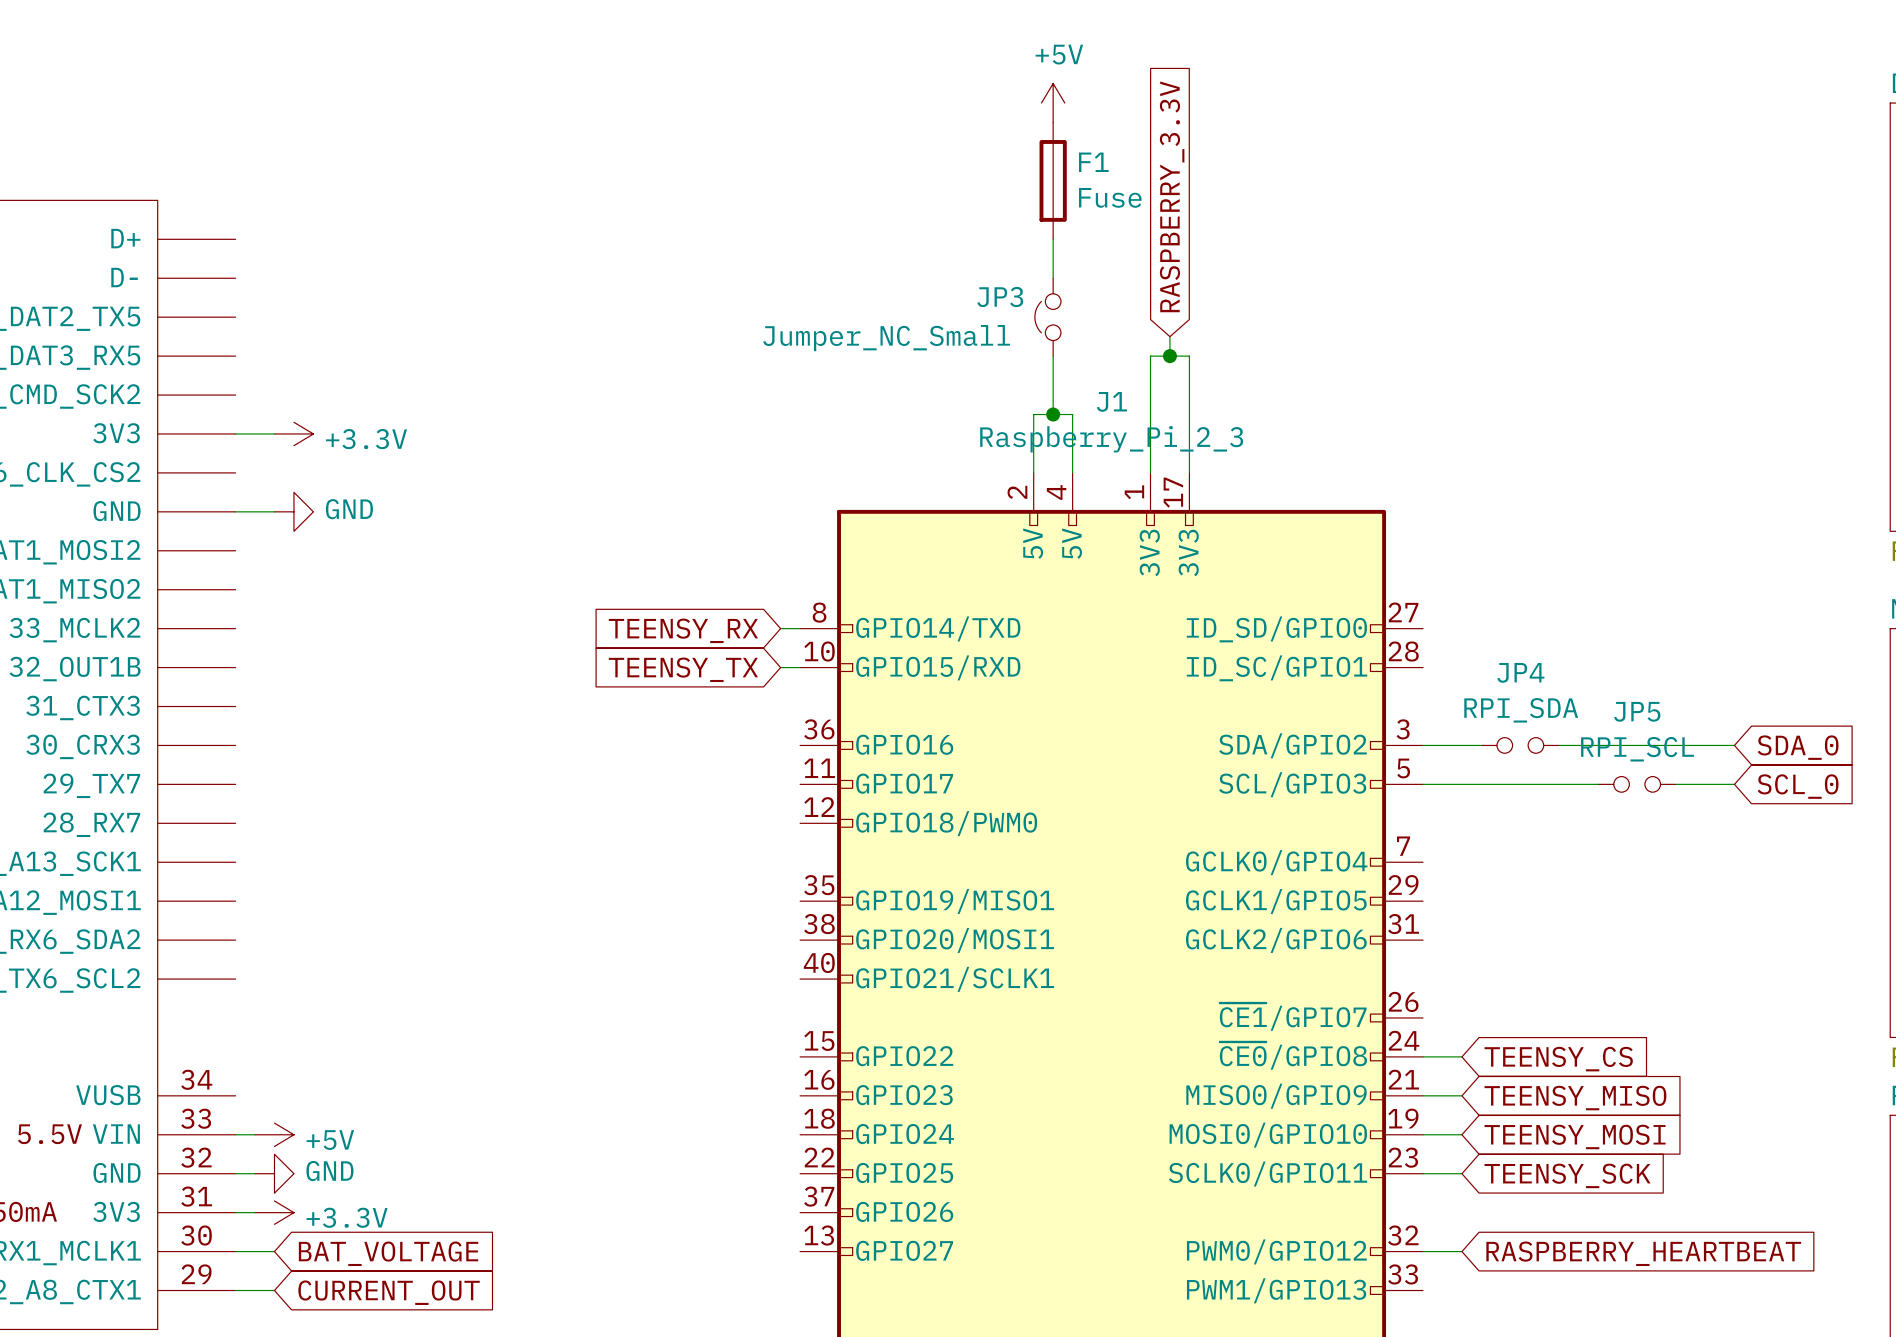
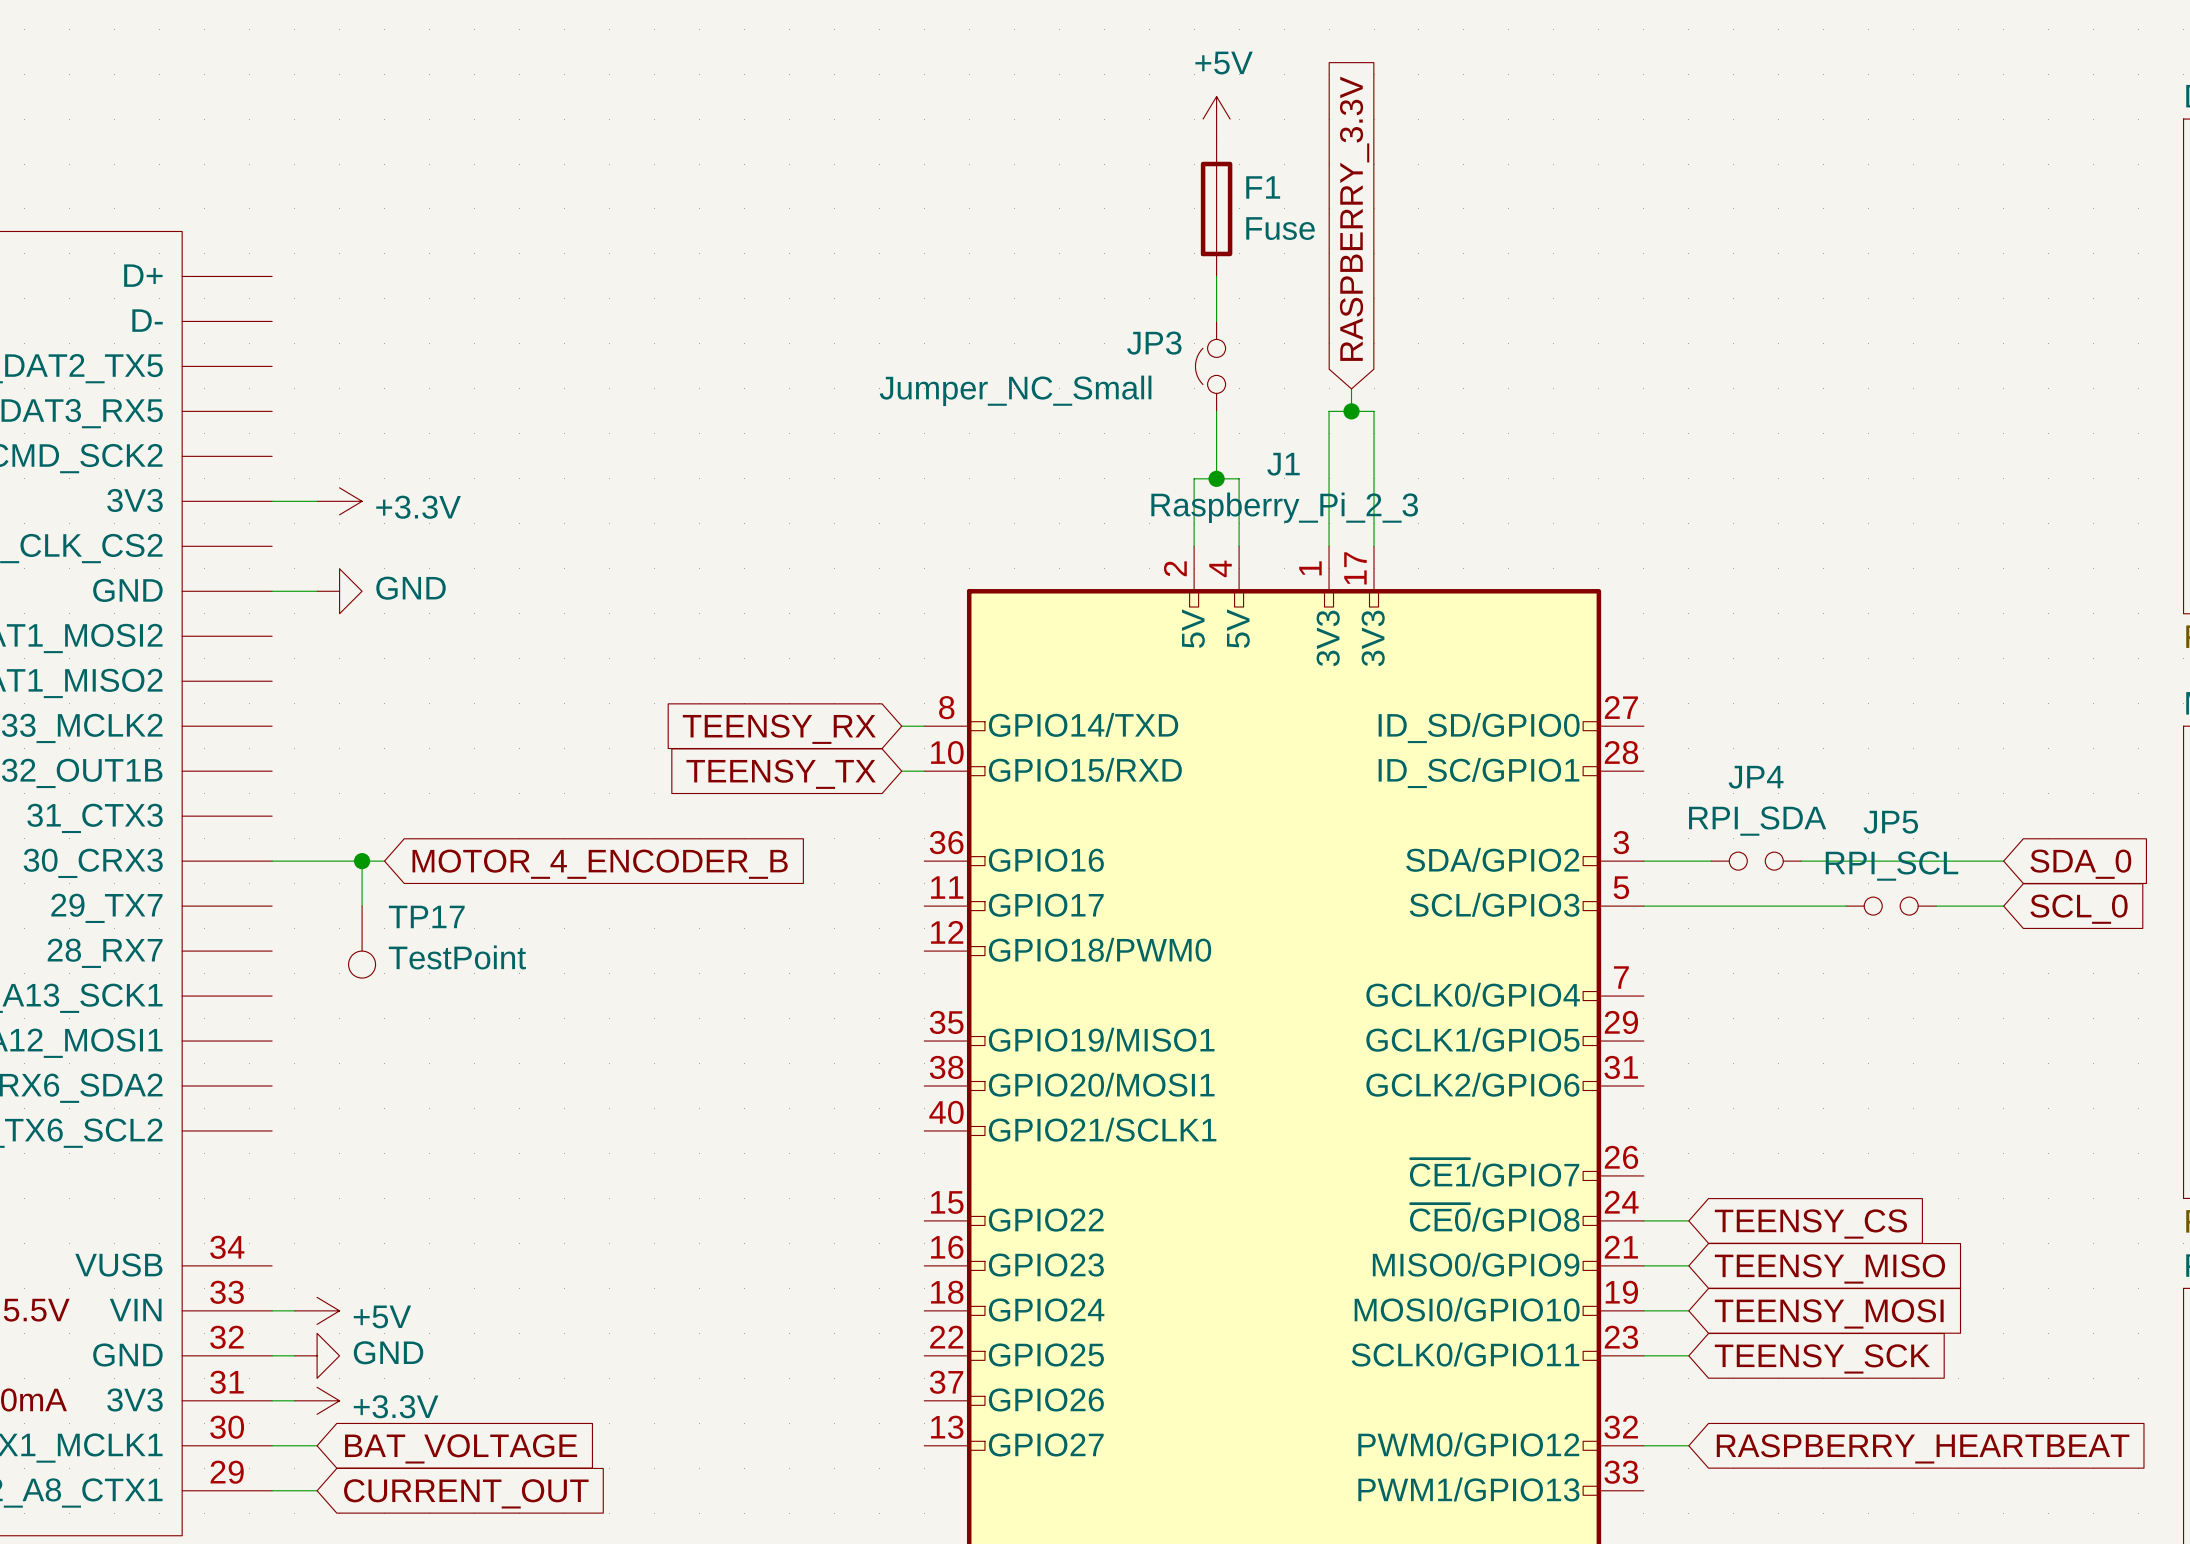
wire: none -> (272, 861) (384, 861)
wire: none -> (362, 861) (362, 906)
junction: none -> (362, 861)
global label: none -> MOTOR_4_ENCODER_B (600, 864)
TP17: none -> TestPoint (362, 942)

